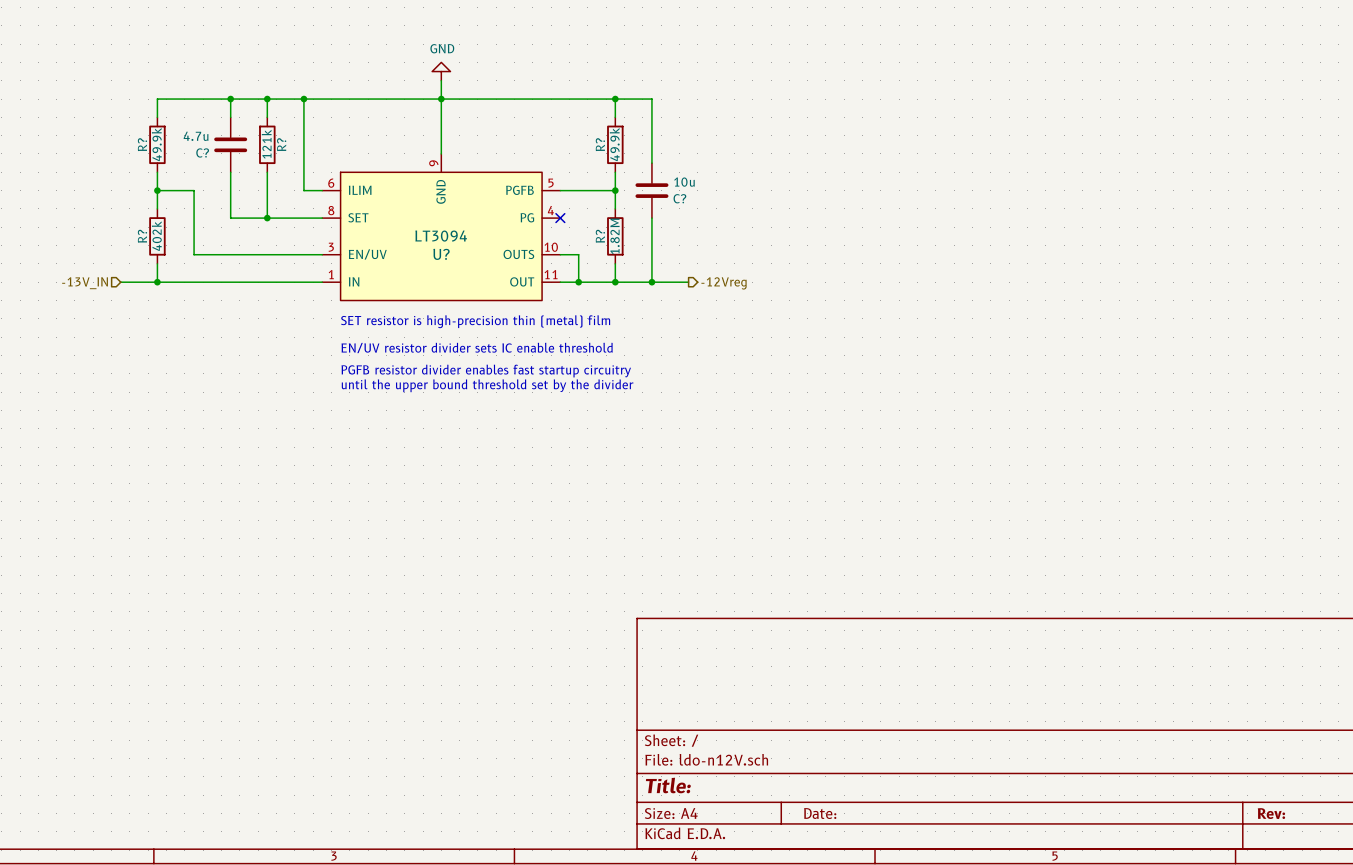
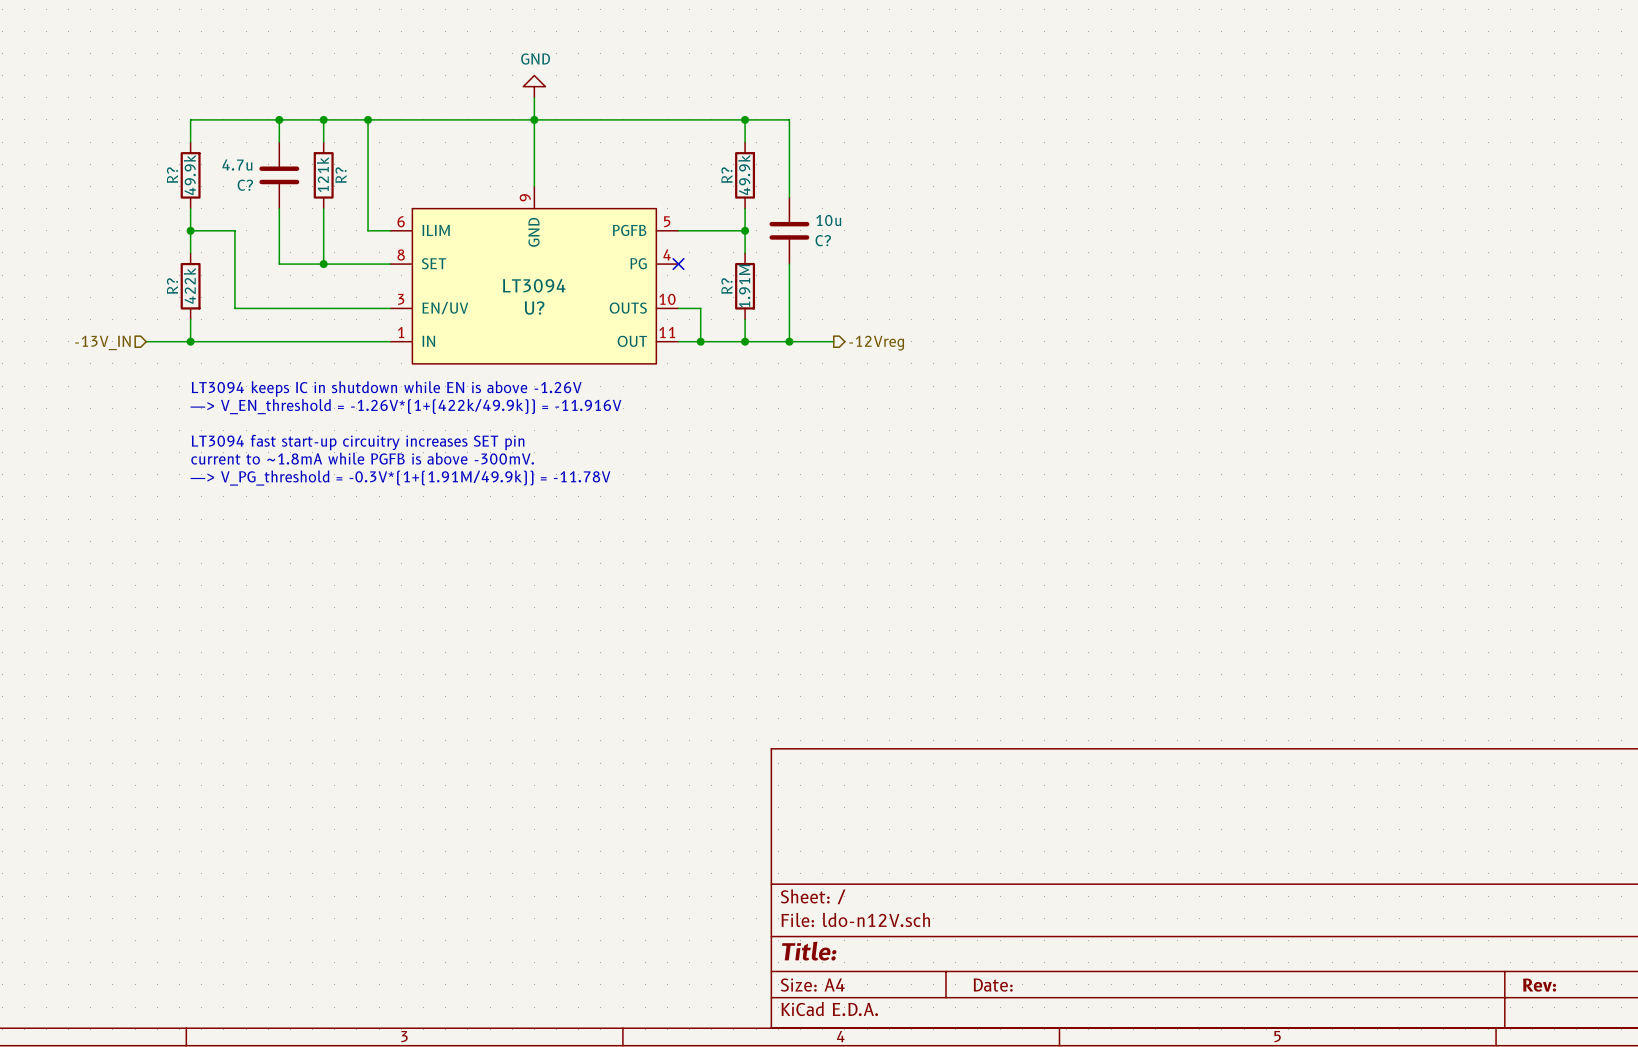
R? value: 402k (156, 236) -> 422k (189, 285)
R? value: 1.82M (615, 236) -> 1.91M (744, 286)
text: none -> LT3094 keeps IC in shutdown while EN is above -1.26V (386, 388)
text: SET resistor is high-precision thin (metal) film (475, 321) -> none
text: none -> —> V_EN_threshold = -1.26V*(1+(422k/49.9k)) = -11.916V (405, 406)
text: EN/UV resistor divider sets IC enable threshold (477, 347) -> none
text: none -> LT3094 fast start-up circuitry increases SET pin (358, 442)
text: PGFB resistor divider enables fast startup circuitry (486, 371) -> none
text: none -> current to ~1.8mA while PGFB is above -300mV. (362, 458)
text: until the upper bound threshold set by the divider (487, 385) -> none
text: none -> —> V_PG_threshold = -0.3V*(1+(1.91M/49.9k)) = -11.78V (400, 478)

